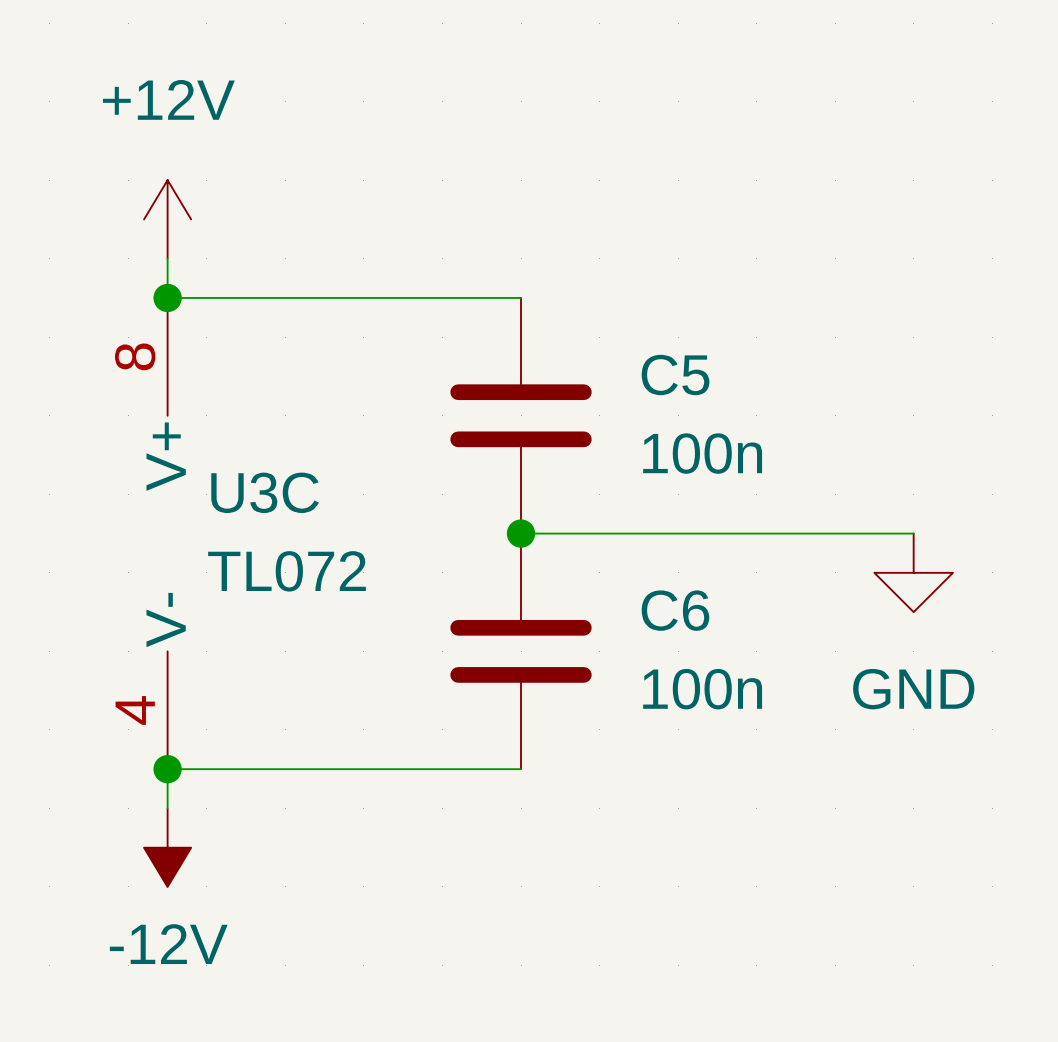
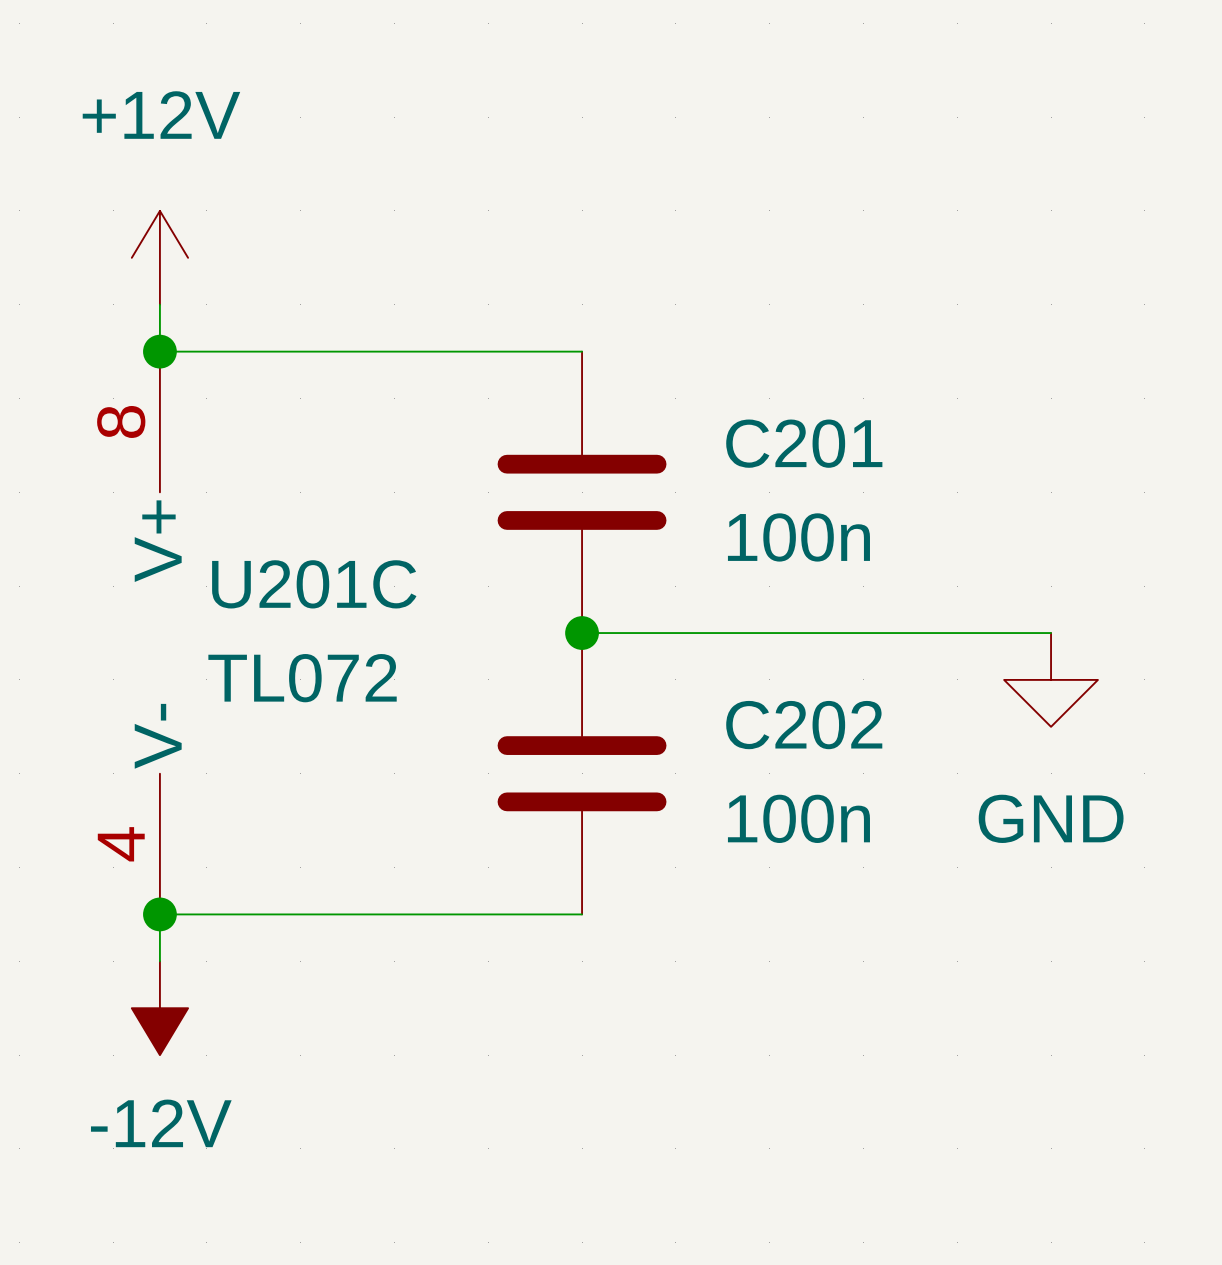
C5 name: C5 (675, 375) -> C201 (804, 443)
U3C name: U3C (265, 492) -> U201C (314, 584)
C6 name: C6 (675, 610) -> C202 (804, 725)

